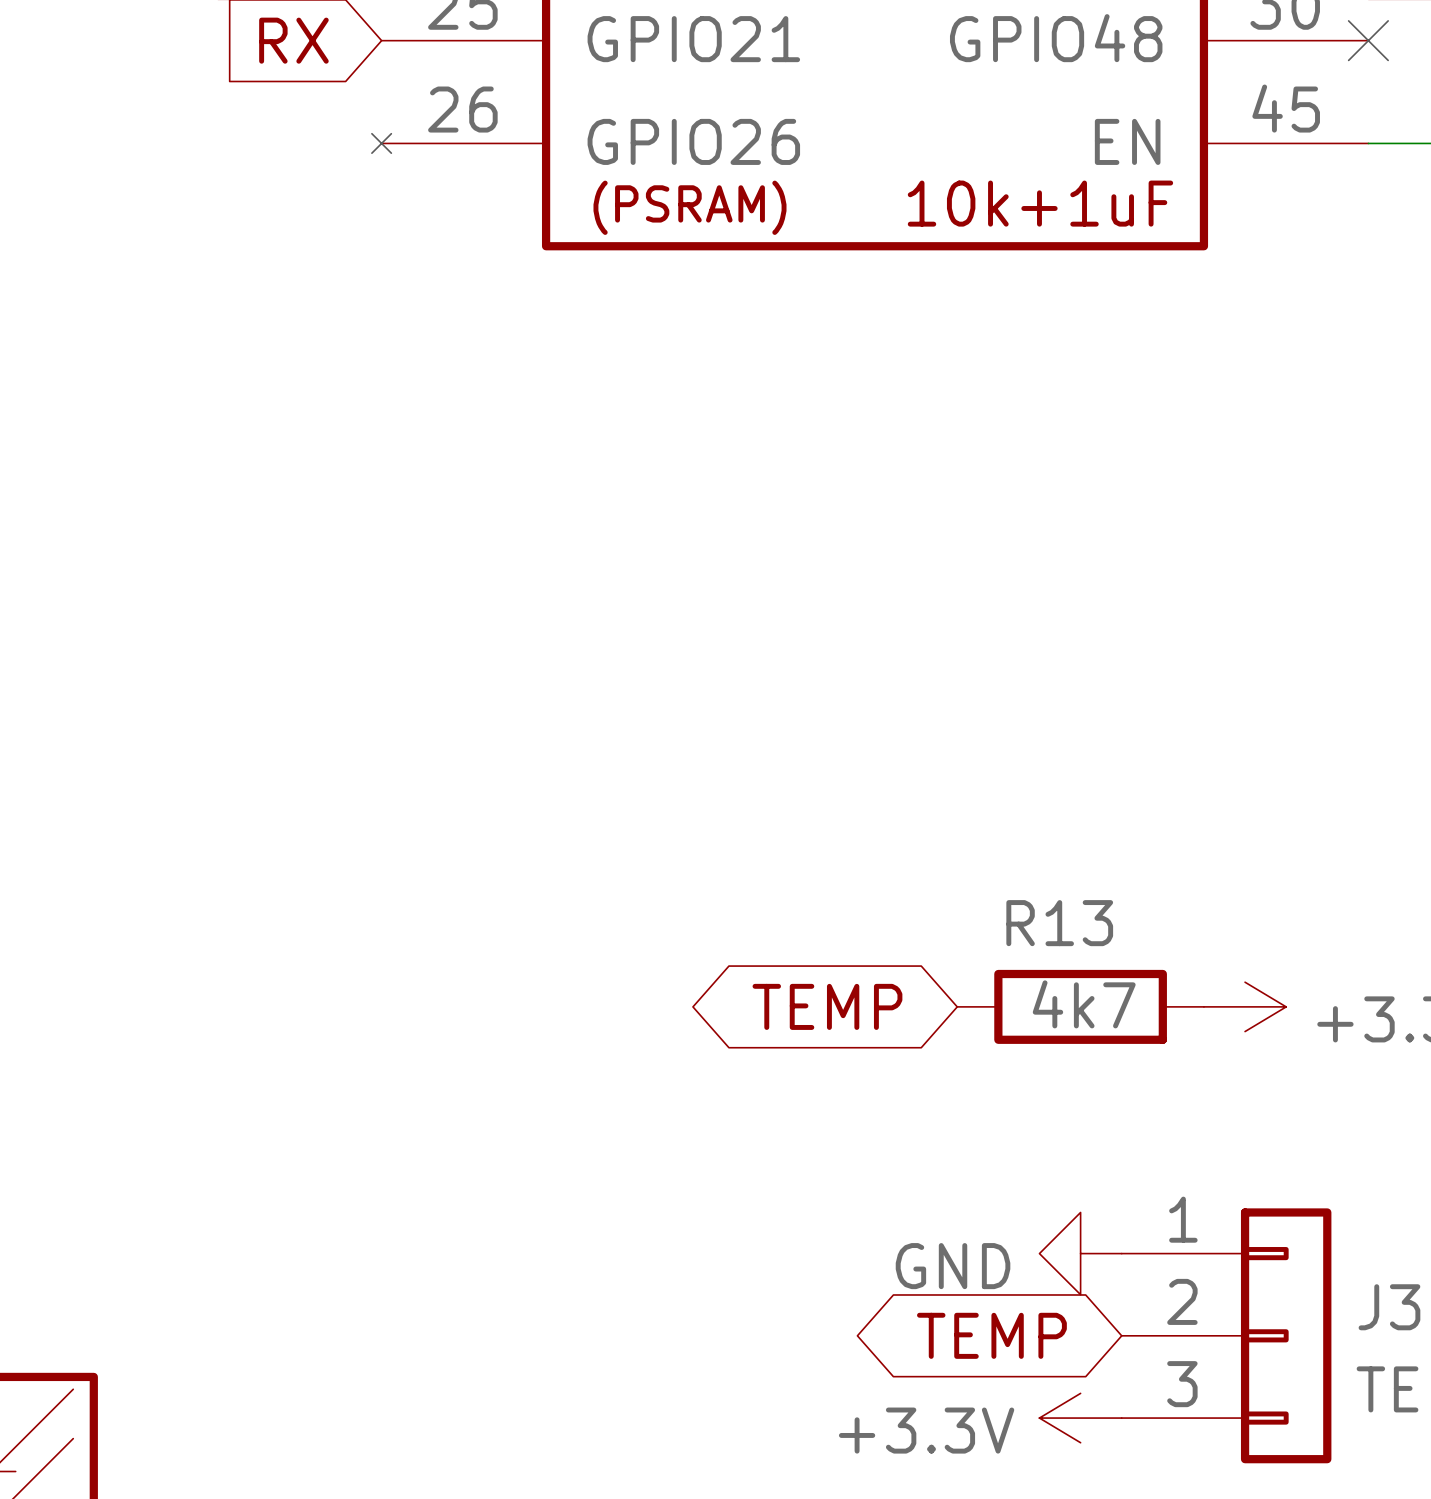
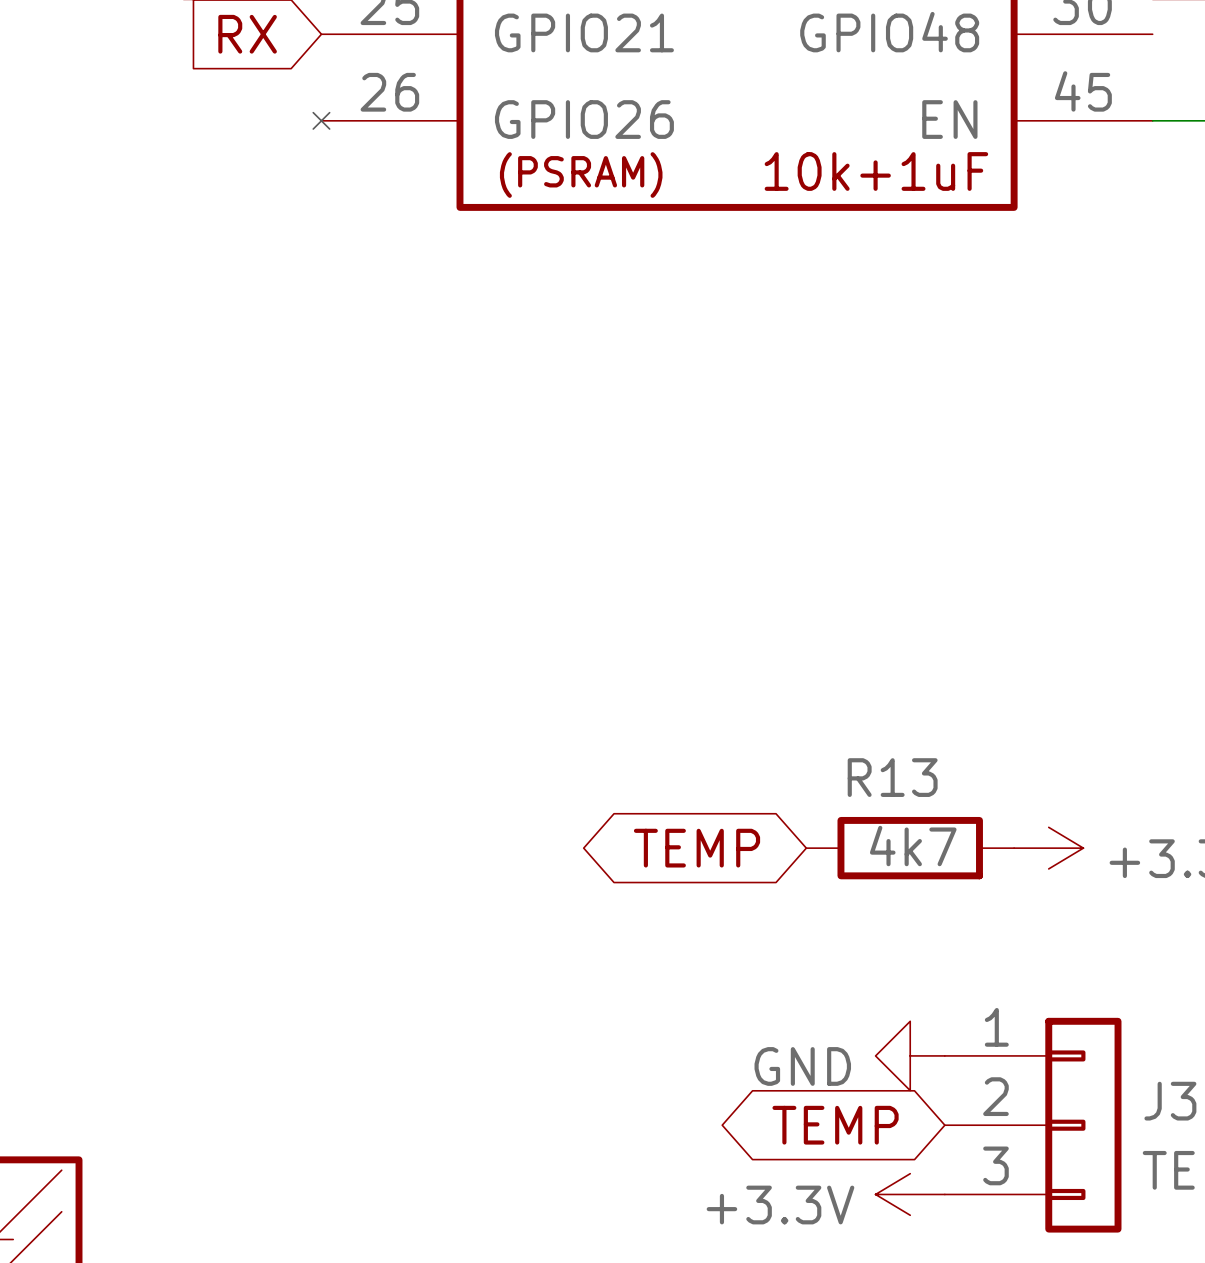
no-connect mark: (1368, 40) -> none

